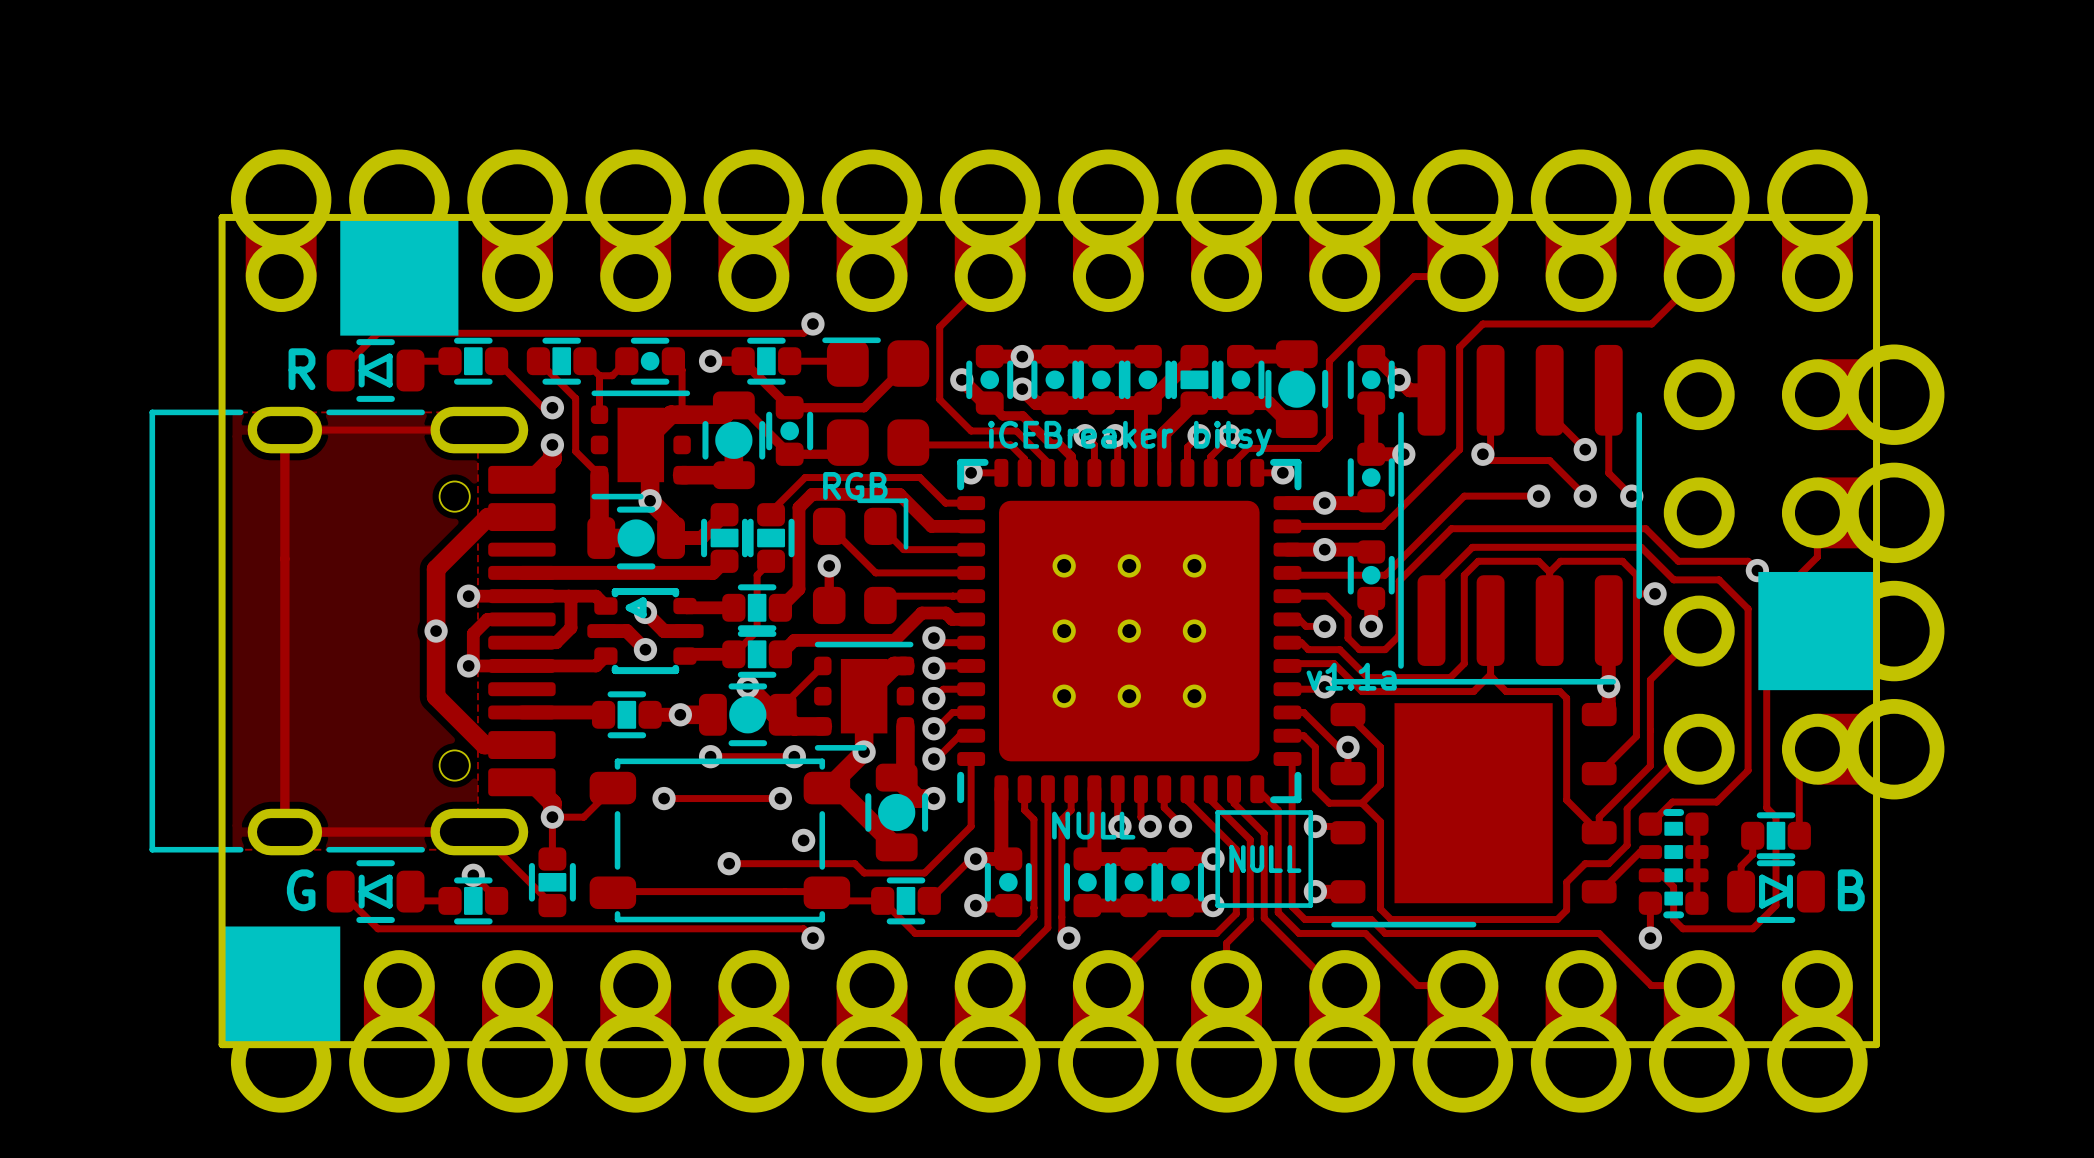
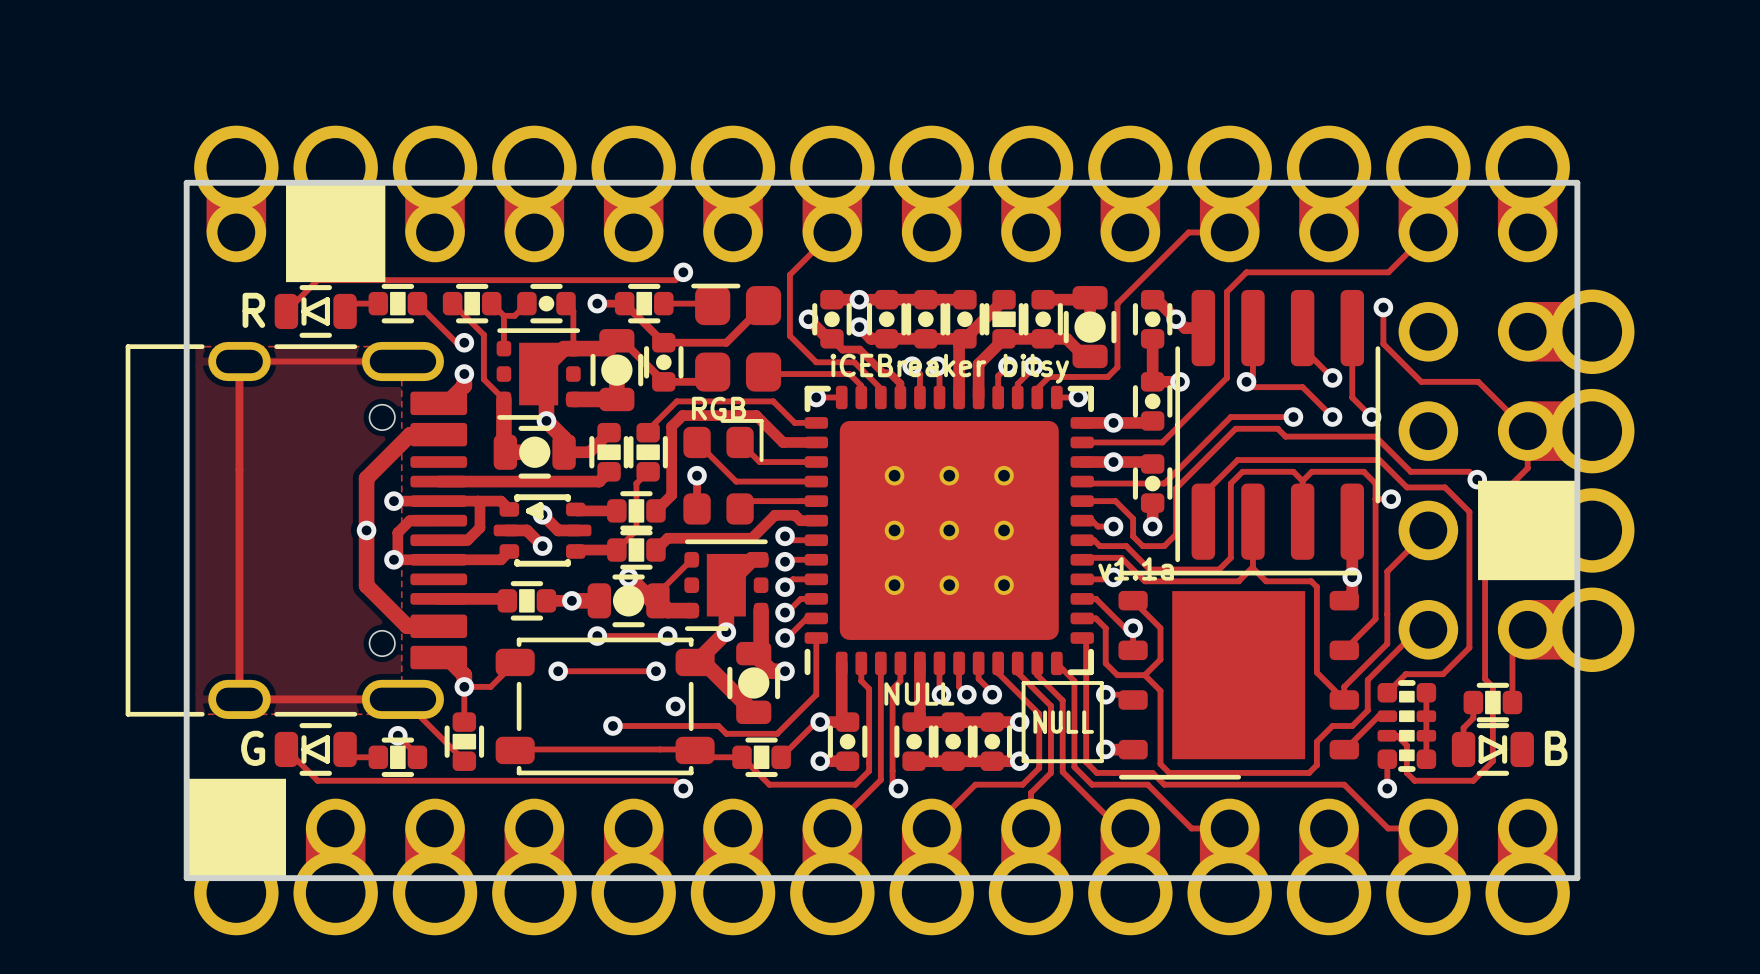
track: none -> (1383, 307) (1383, 343) (1421, 381) (1478, 381) (1527, 431)
via: none -> (1383, 307)
track: (1451, 528) (1645, 528) -> (1220, 444) (1235, 428) (1277, 428) (1285, 436) (1375, 436) (1383, 444)

